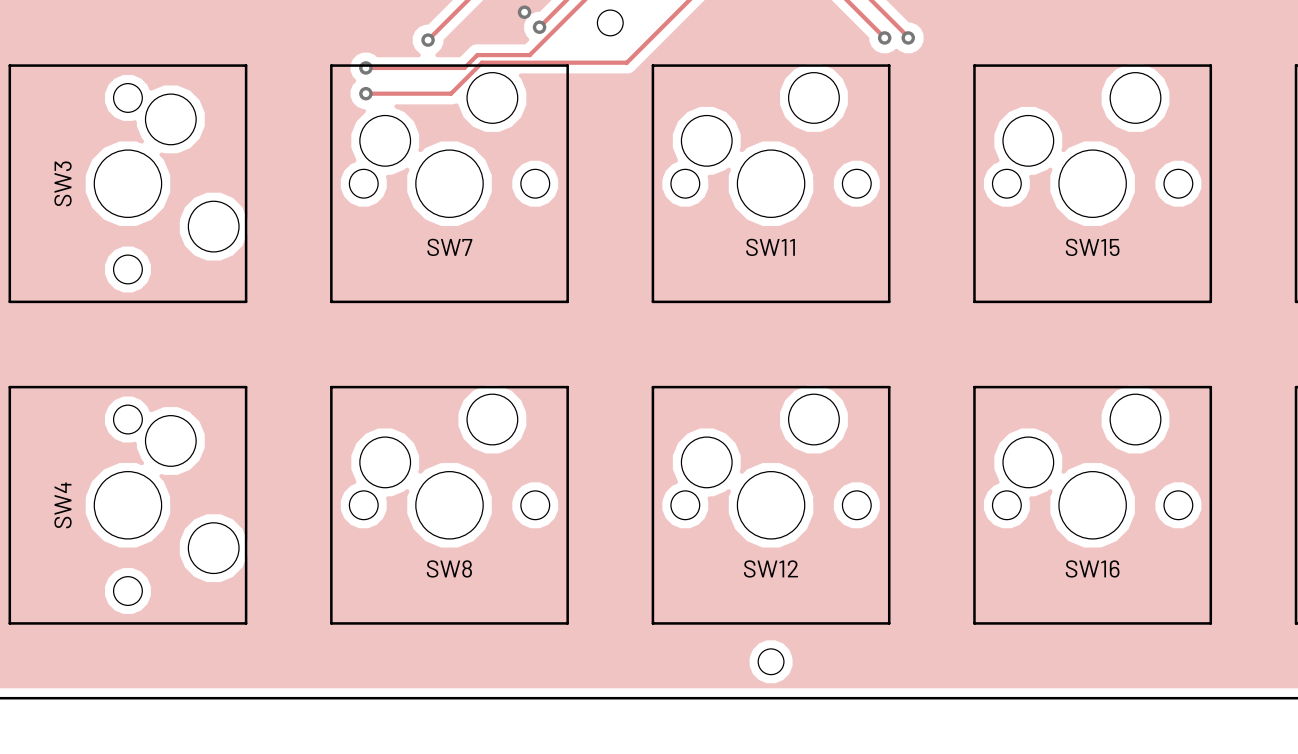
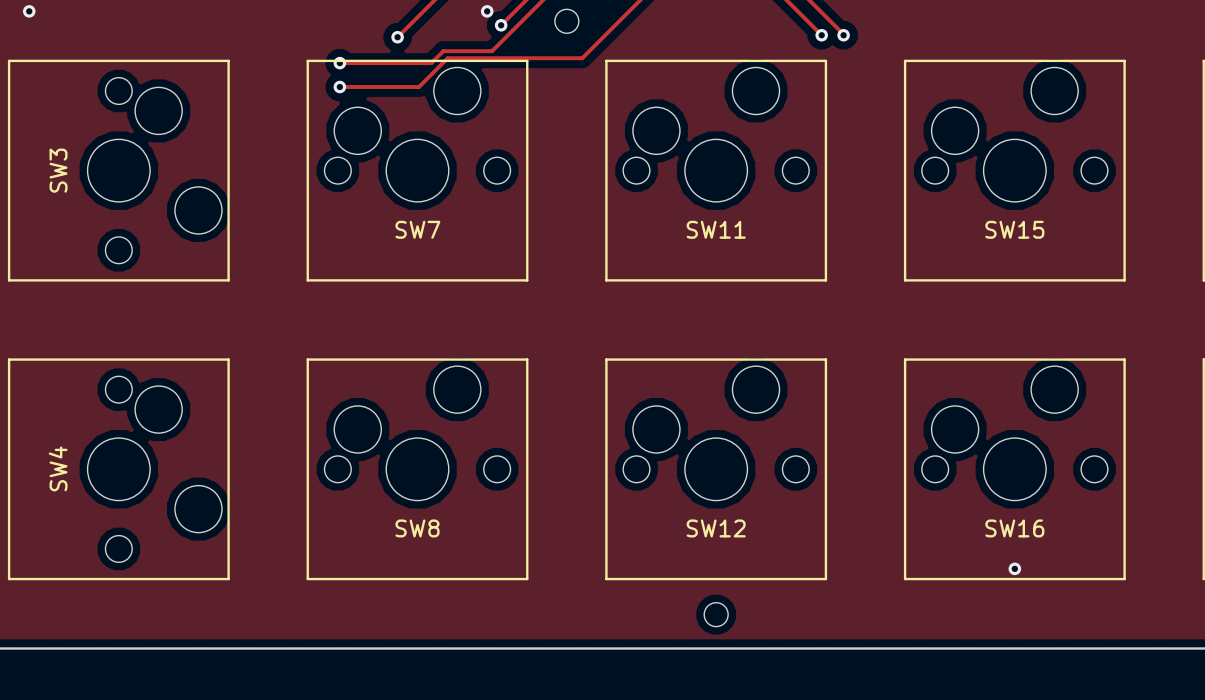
via: none -> (29, 11)
via: none -> (1014, 568)

